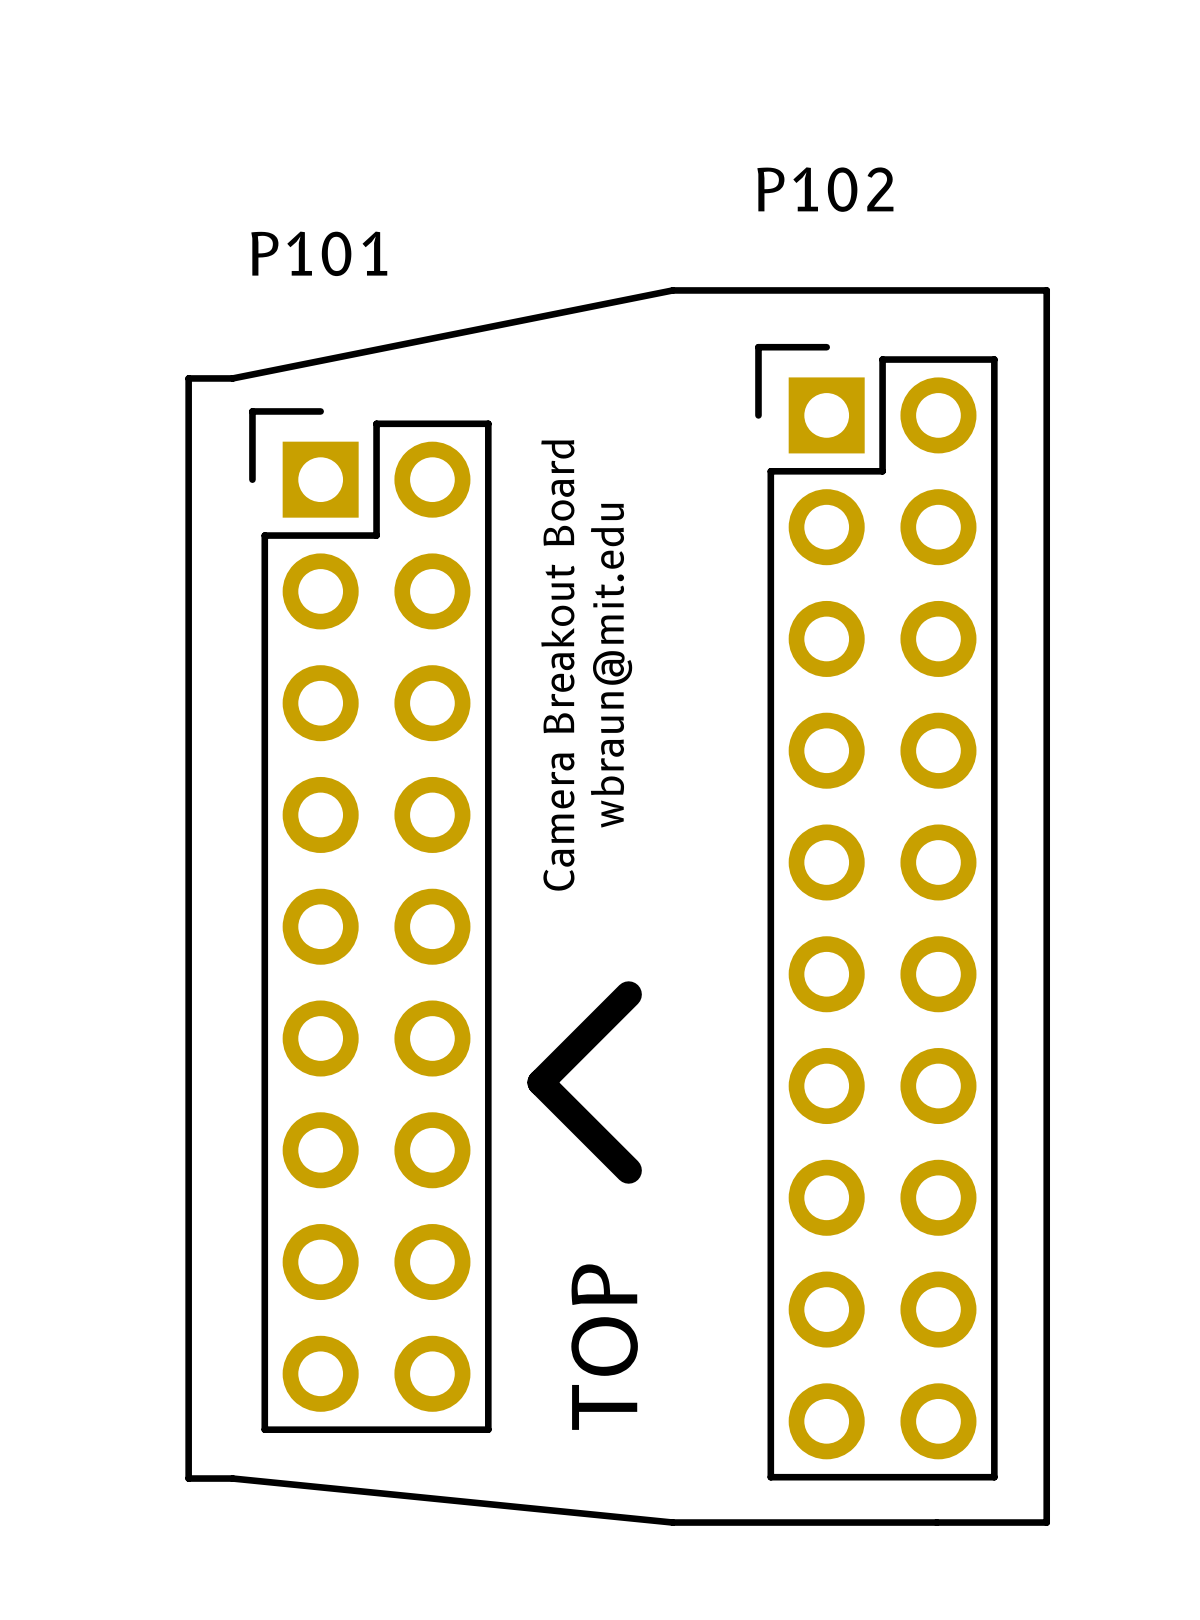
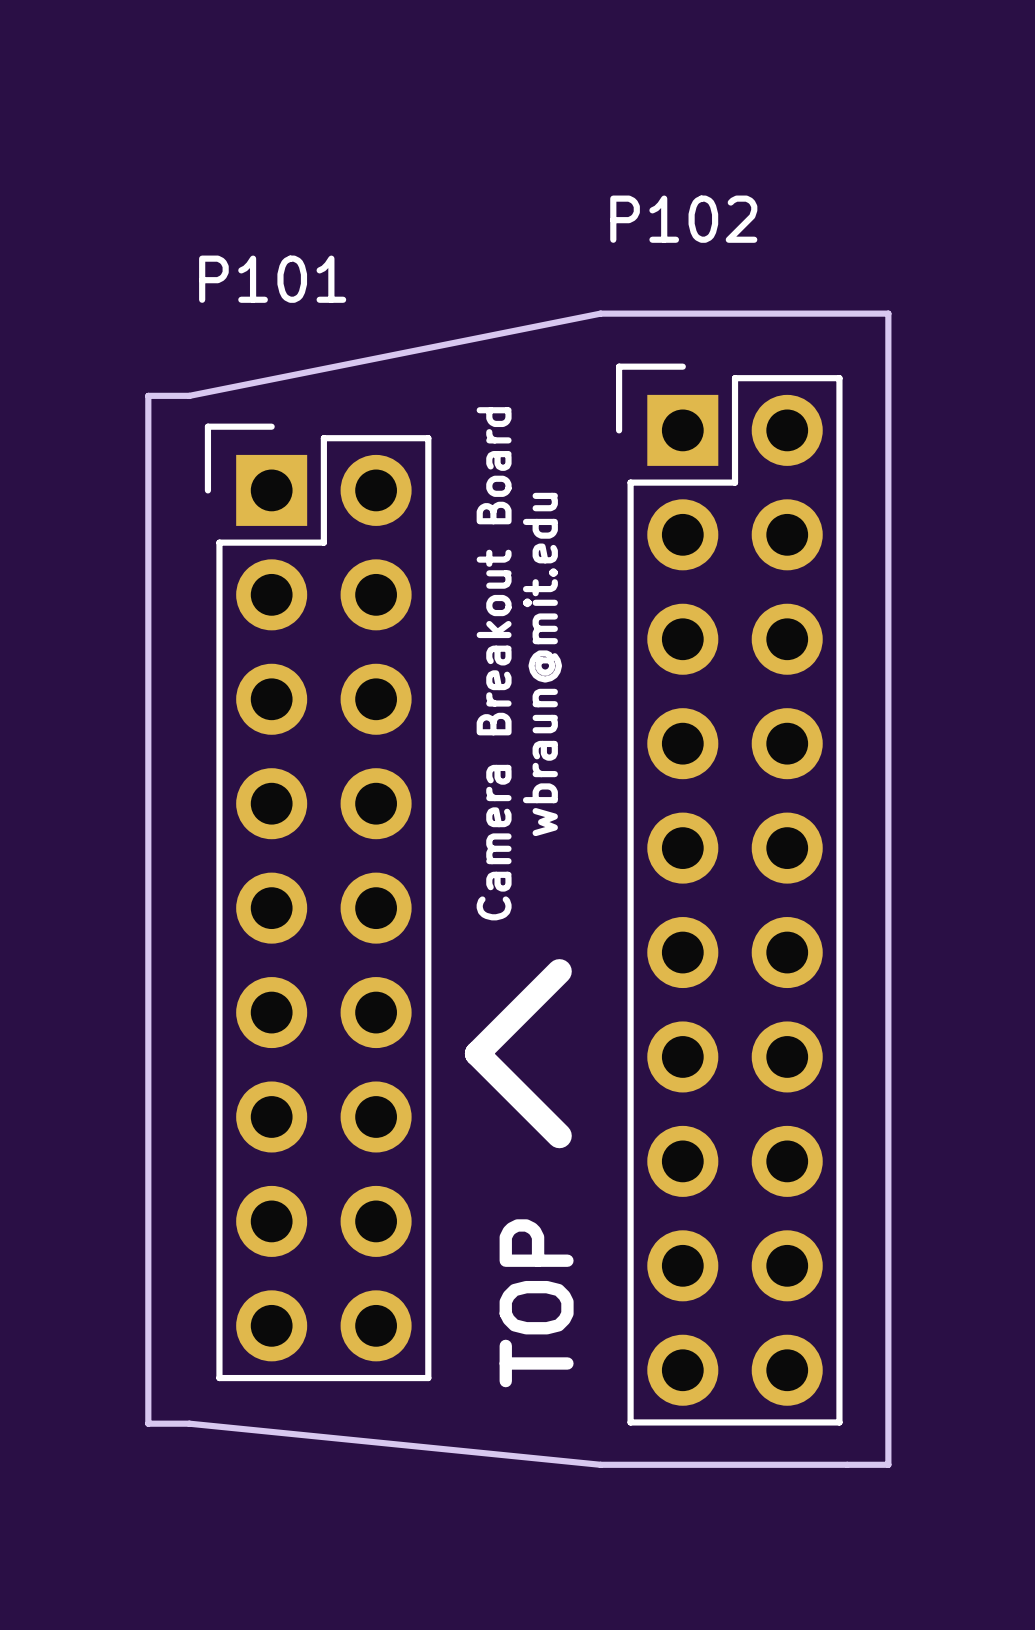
board edge: (980, 290) (1046, 290) (1046, 1522) (980, 1522) -> (888, 313) (888, 1464)
P102 position: (876, 912) -> (729, 894)

